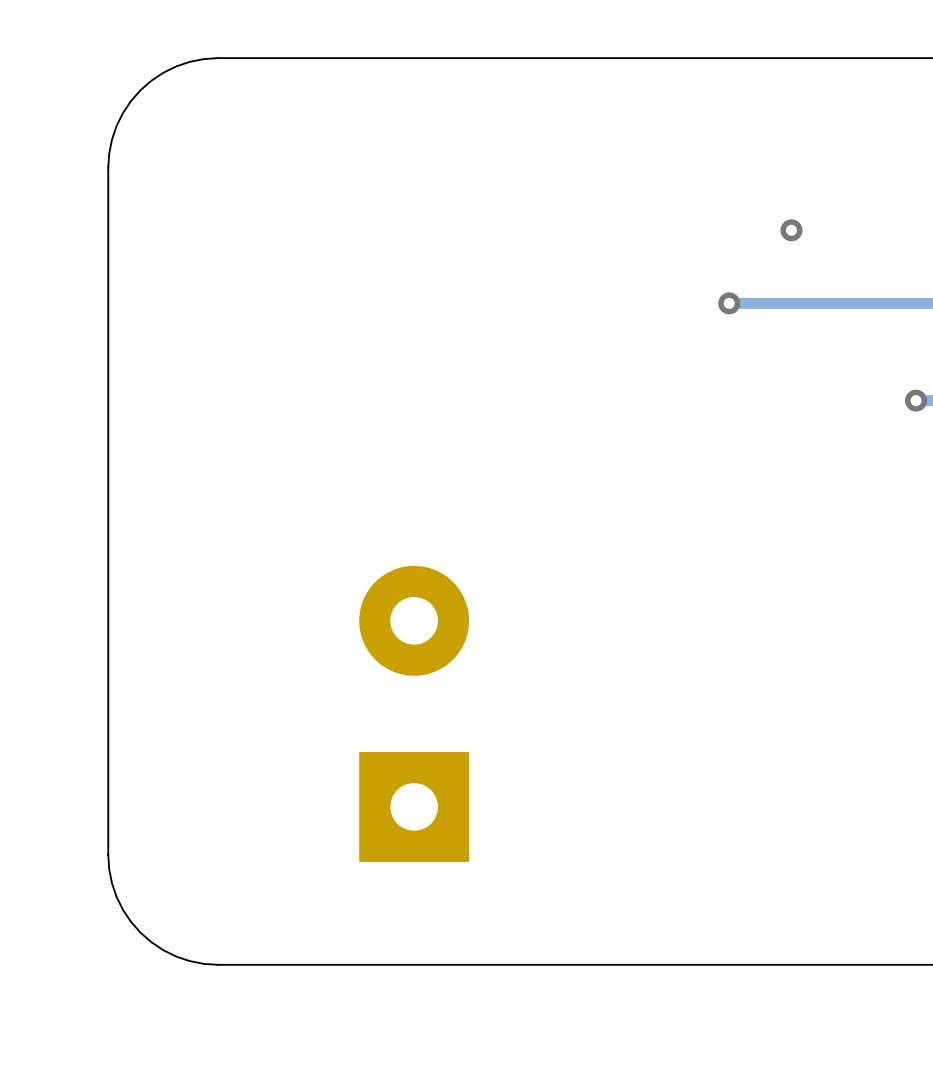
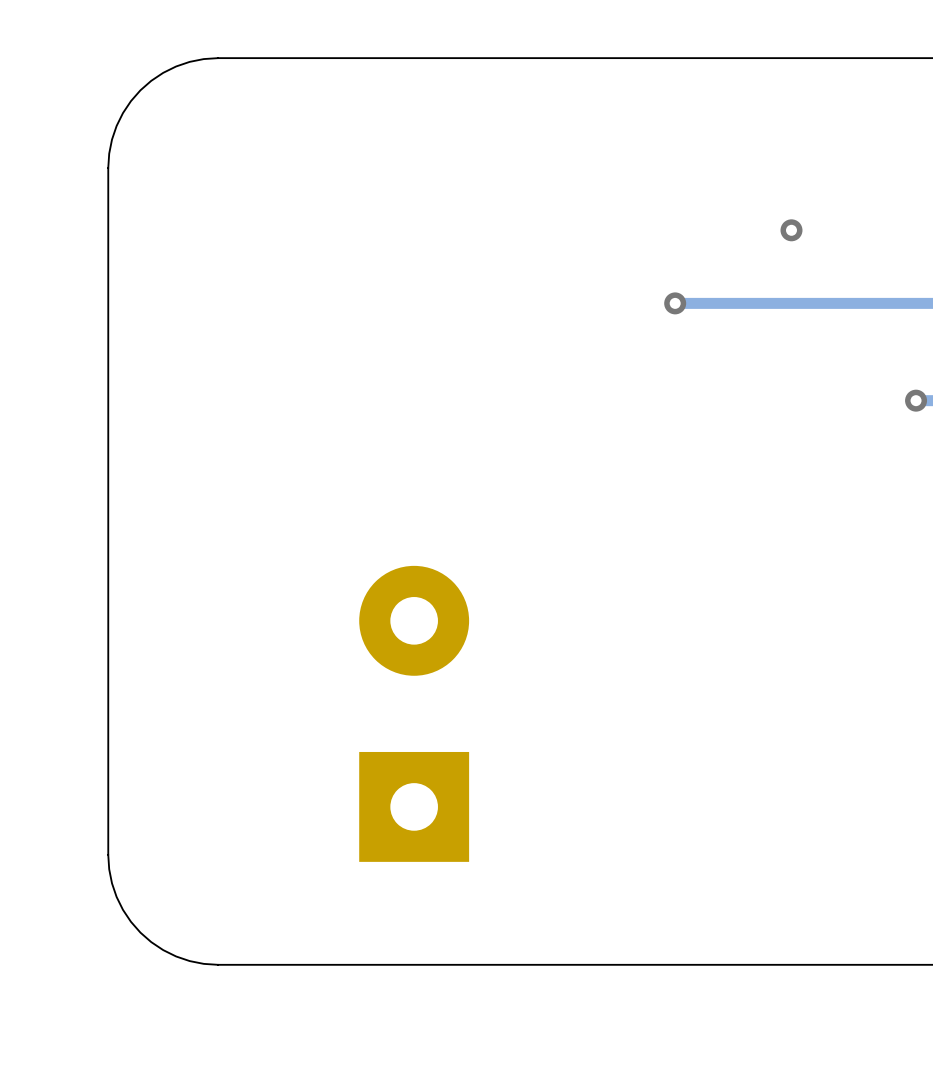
track: none -> (729, 303) (675, 303)
via position: (729, 303) -> (675, 303)

